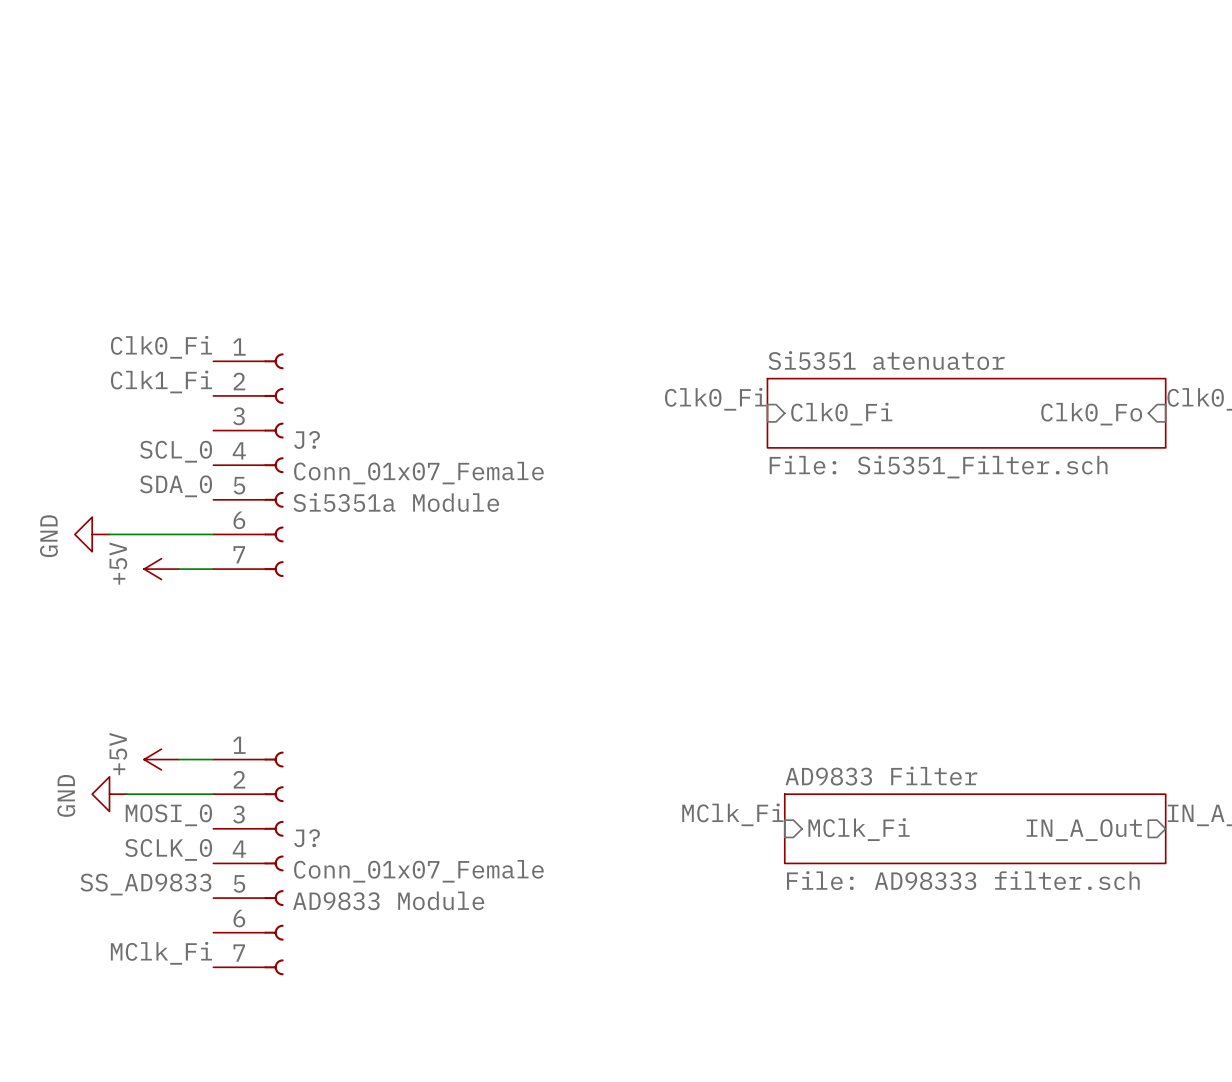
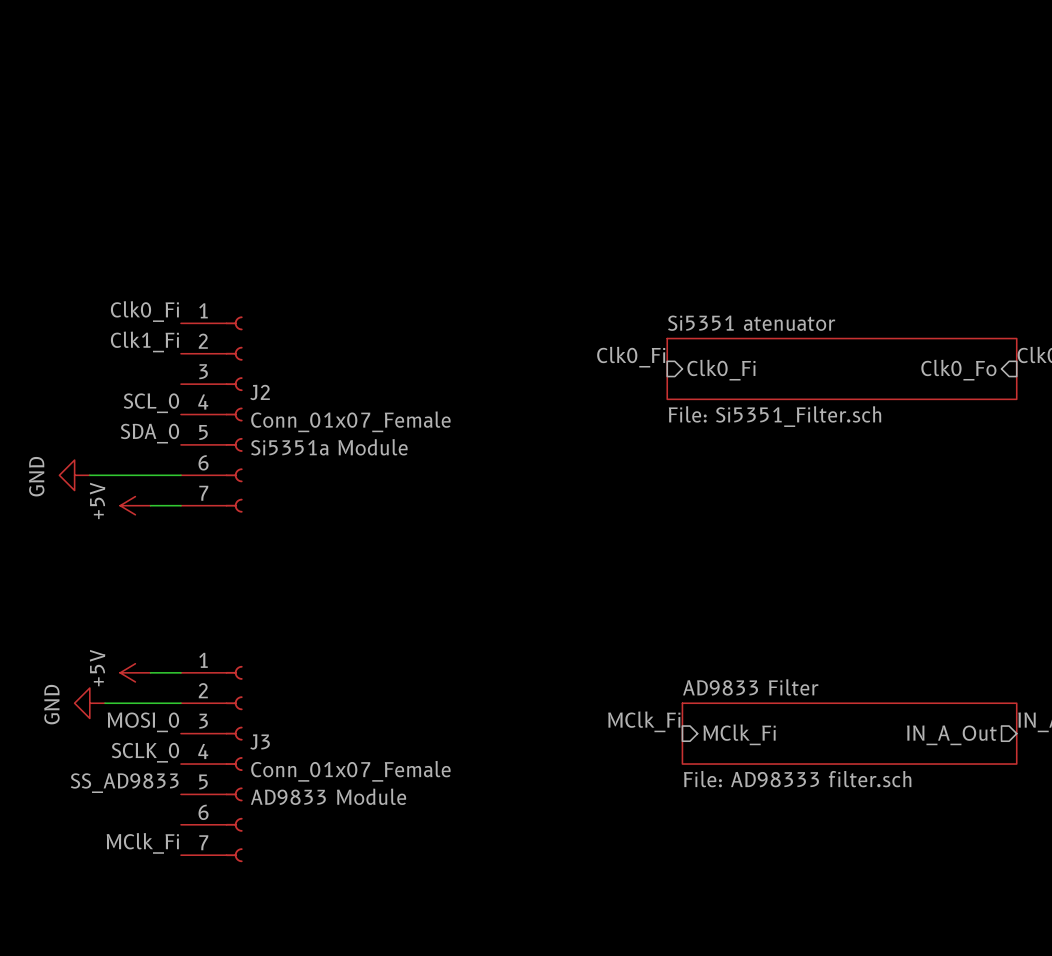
J? name: J? (307, 439) -> J2 (260, 392)
J? name: J? (307, 838) -> J3 (260, 741)

